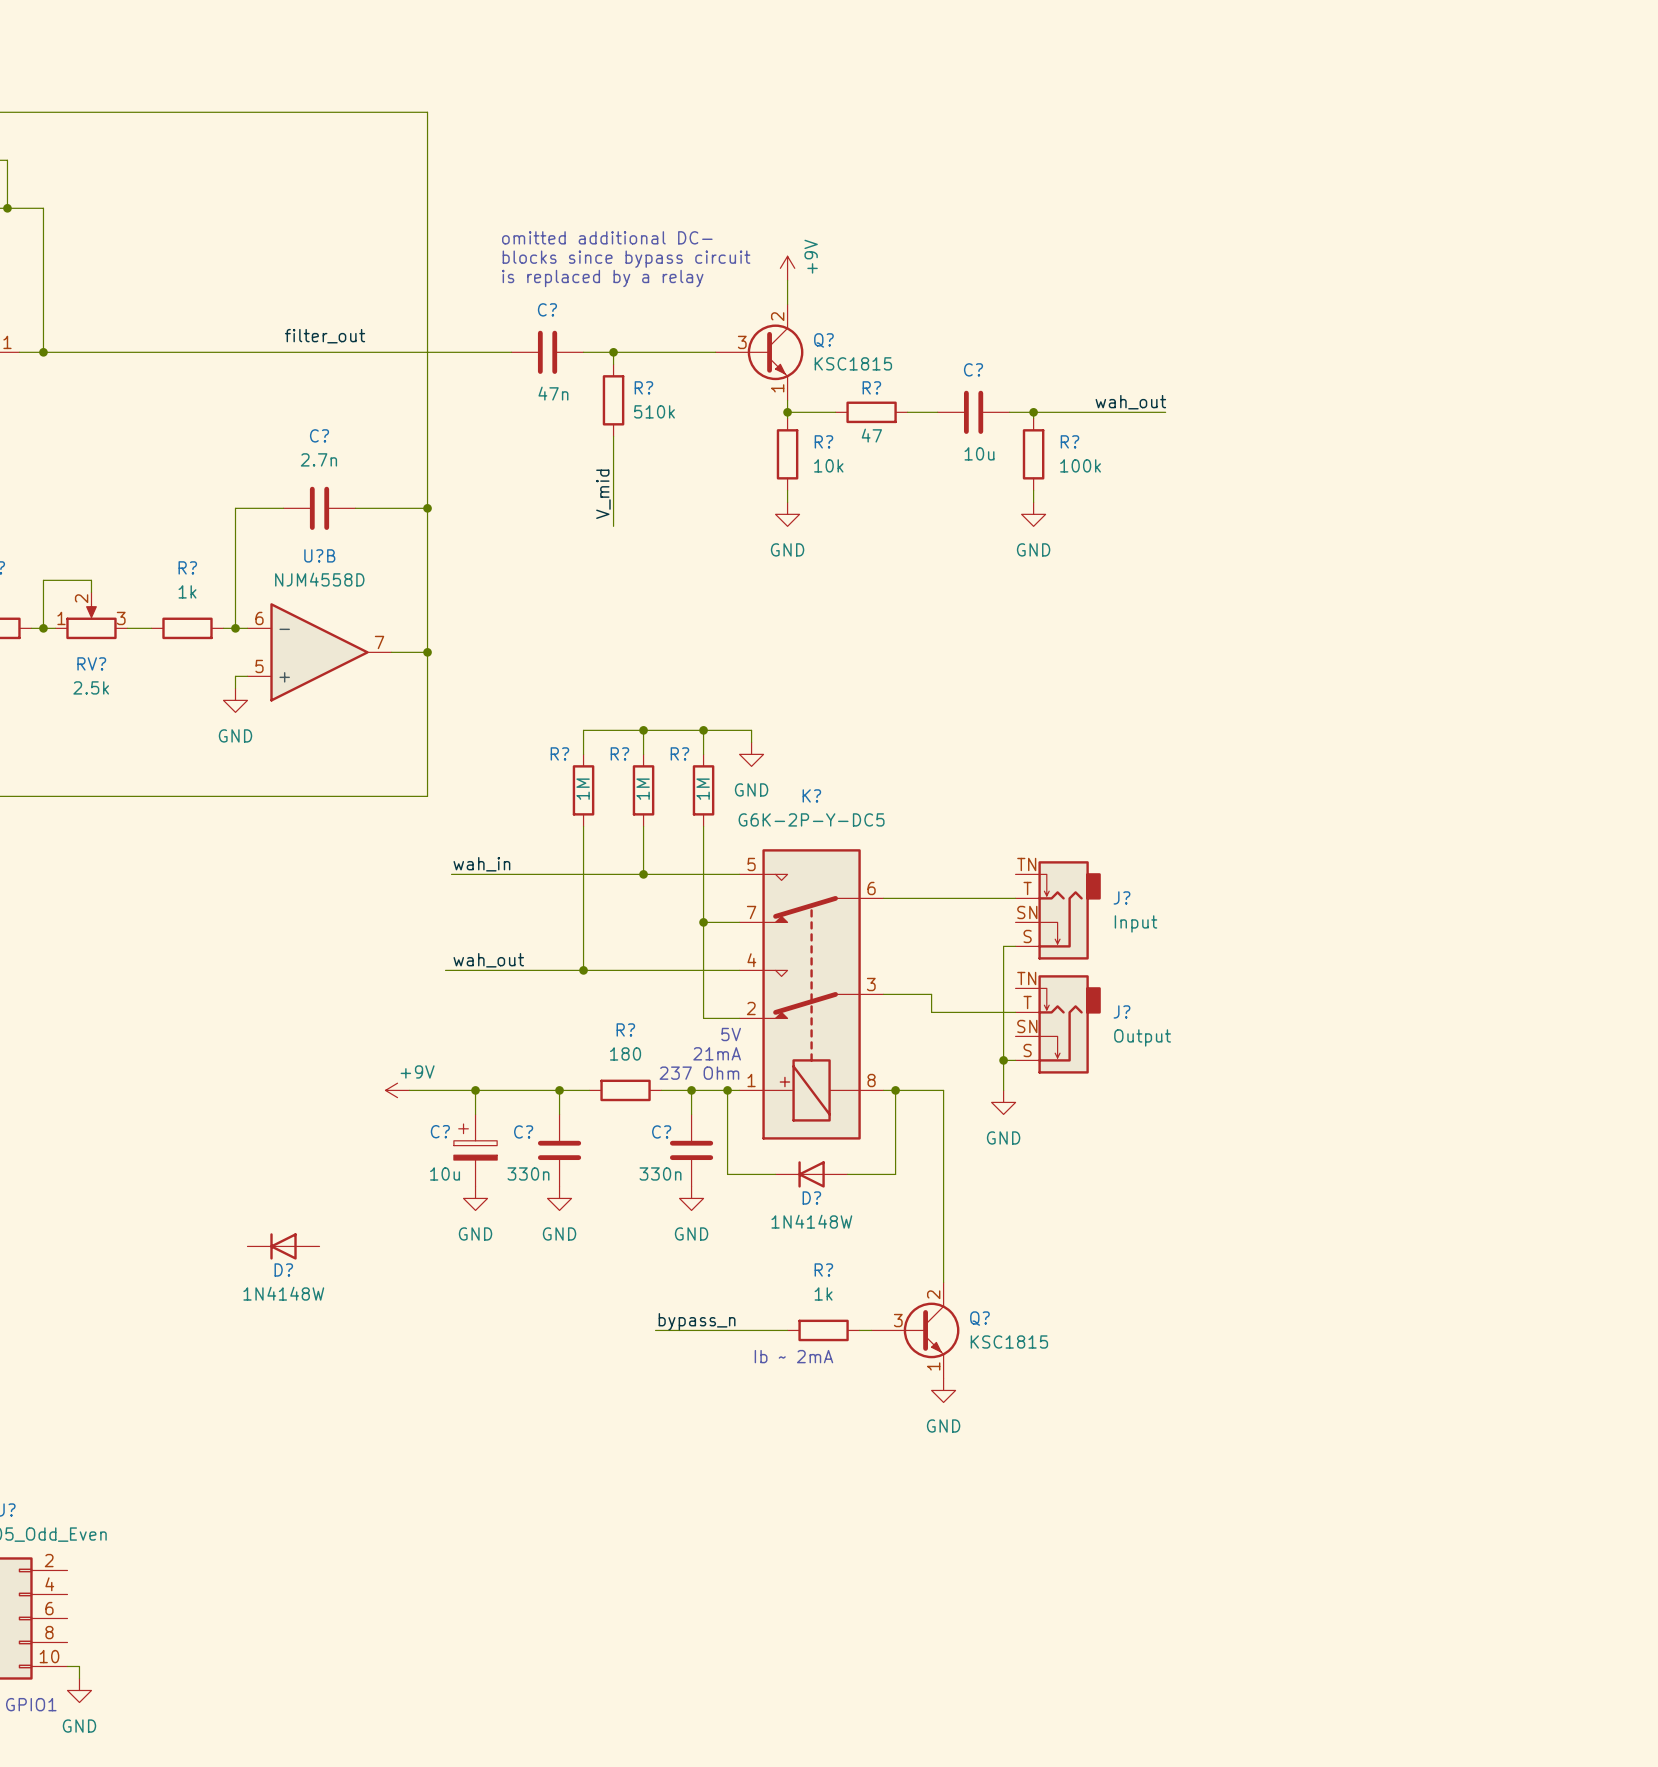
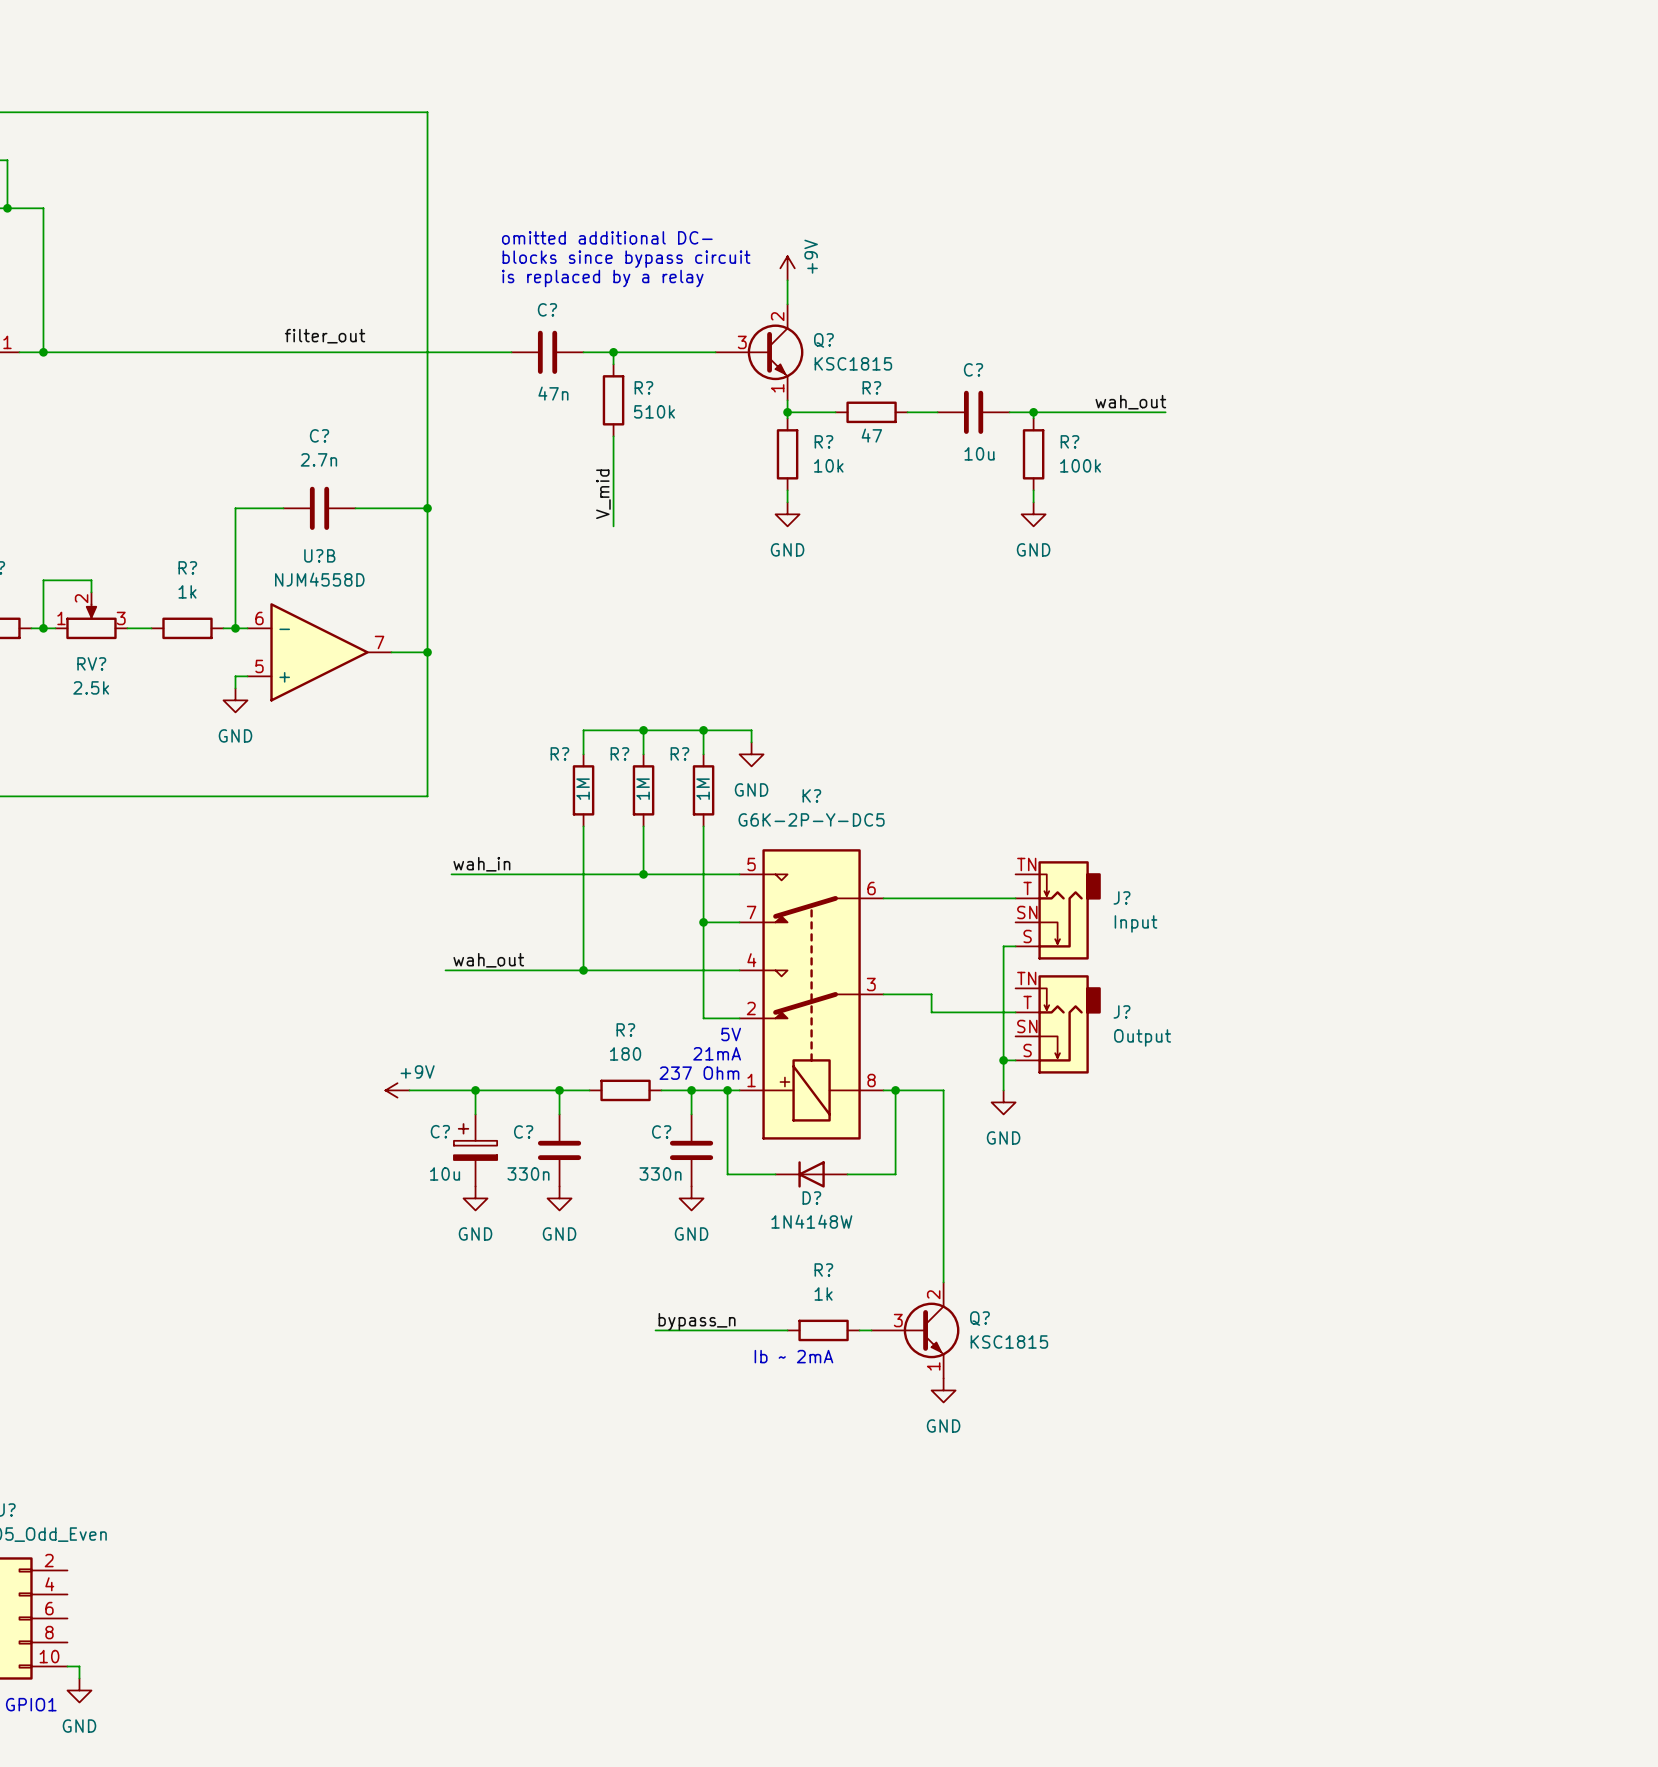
D?: 1N4148W (283, 1246) -> none

